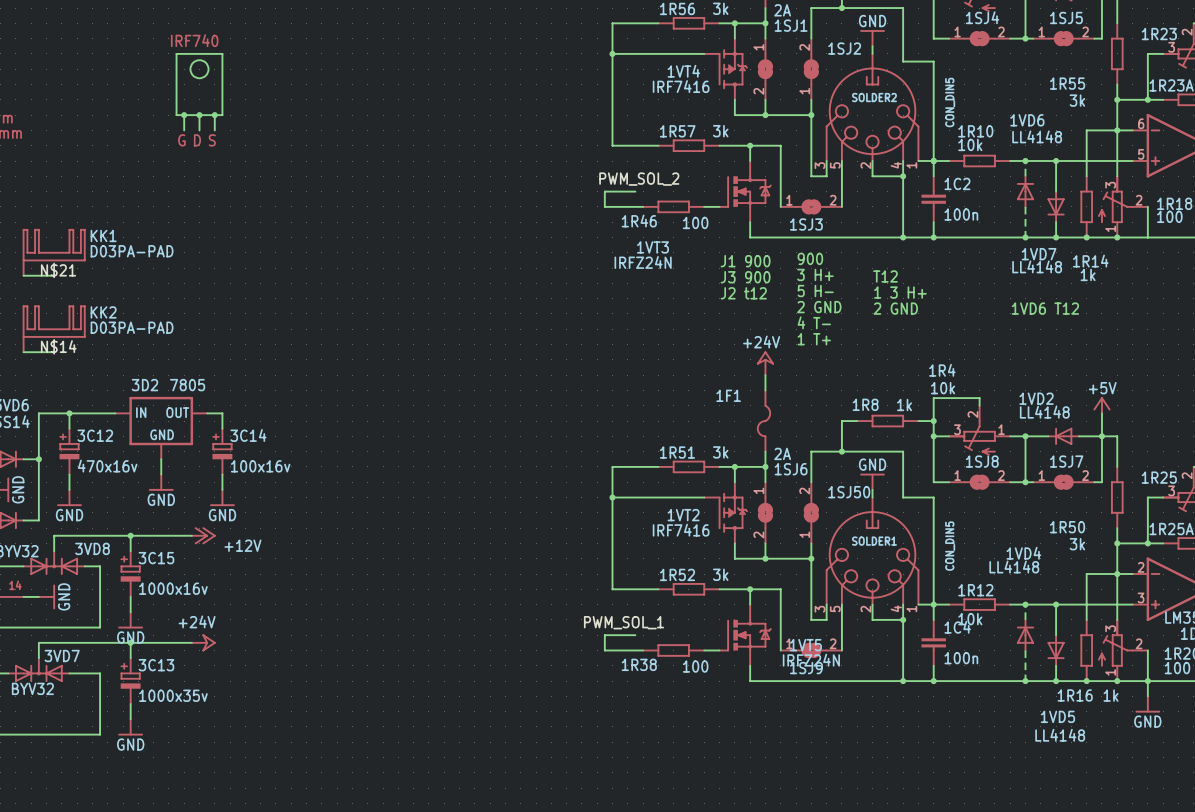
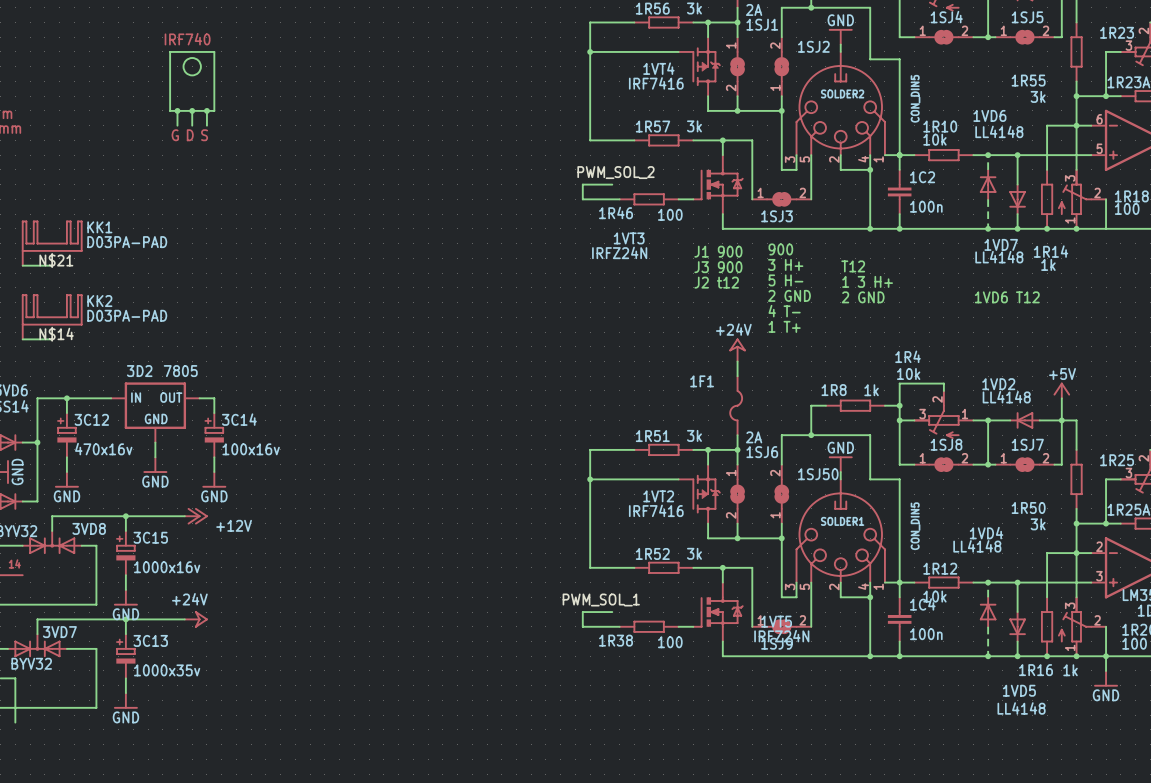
wire: (23, 596) (38, 596) -> none
power symbol: GND (46, 596) -> none
wire: none -> (0, 678) (15, 678) (15, 722)

